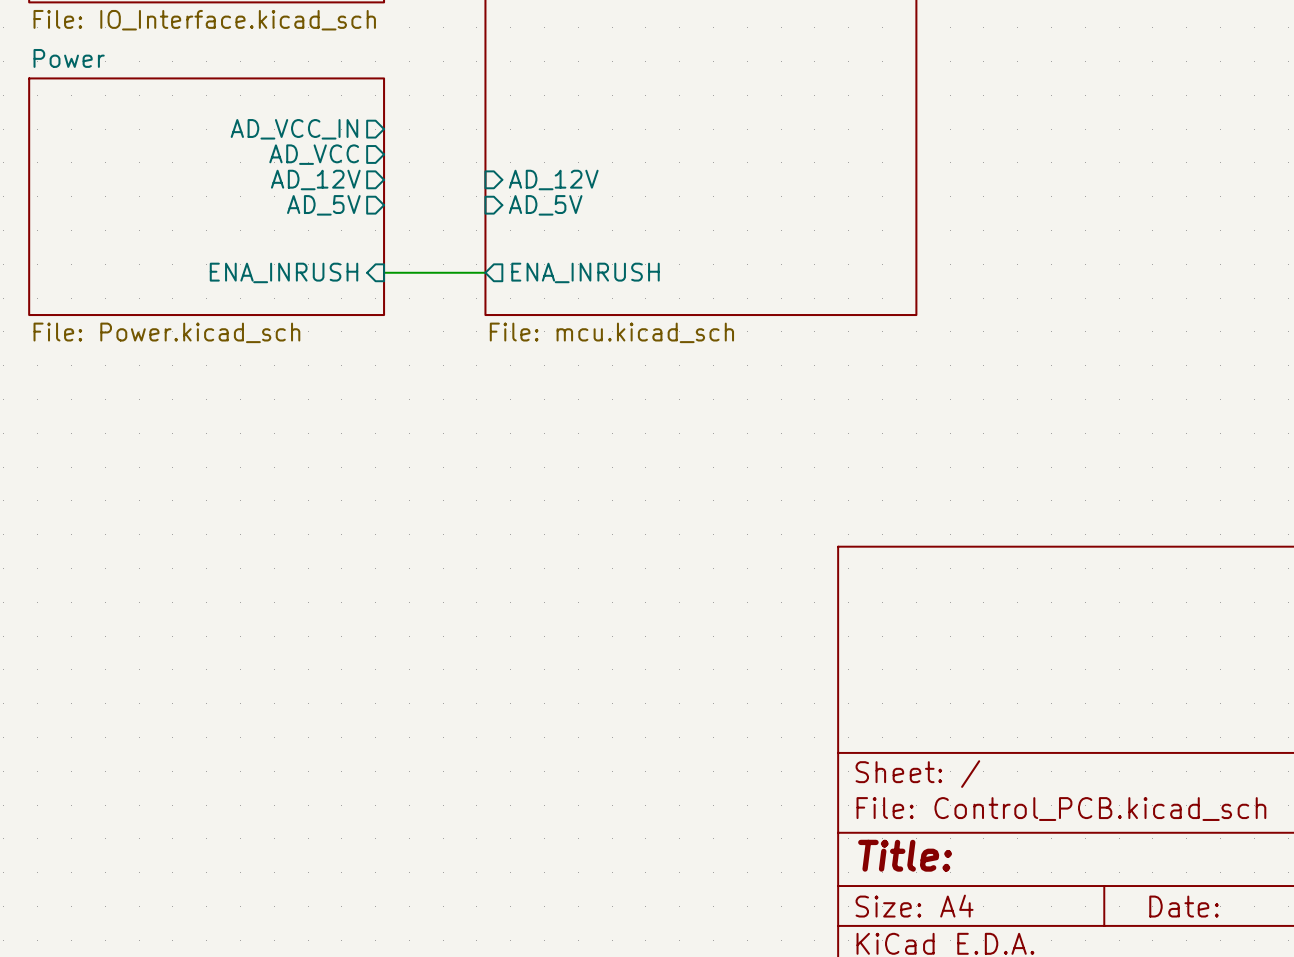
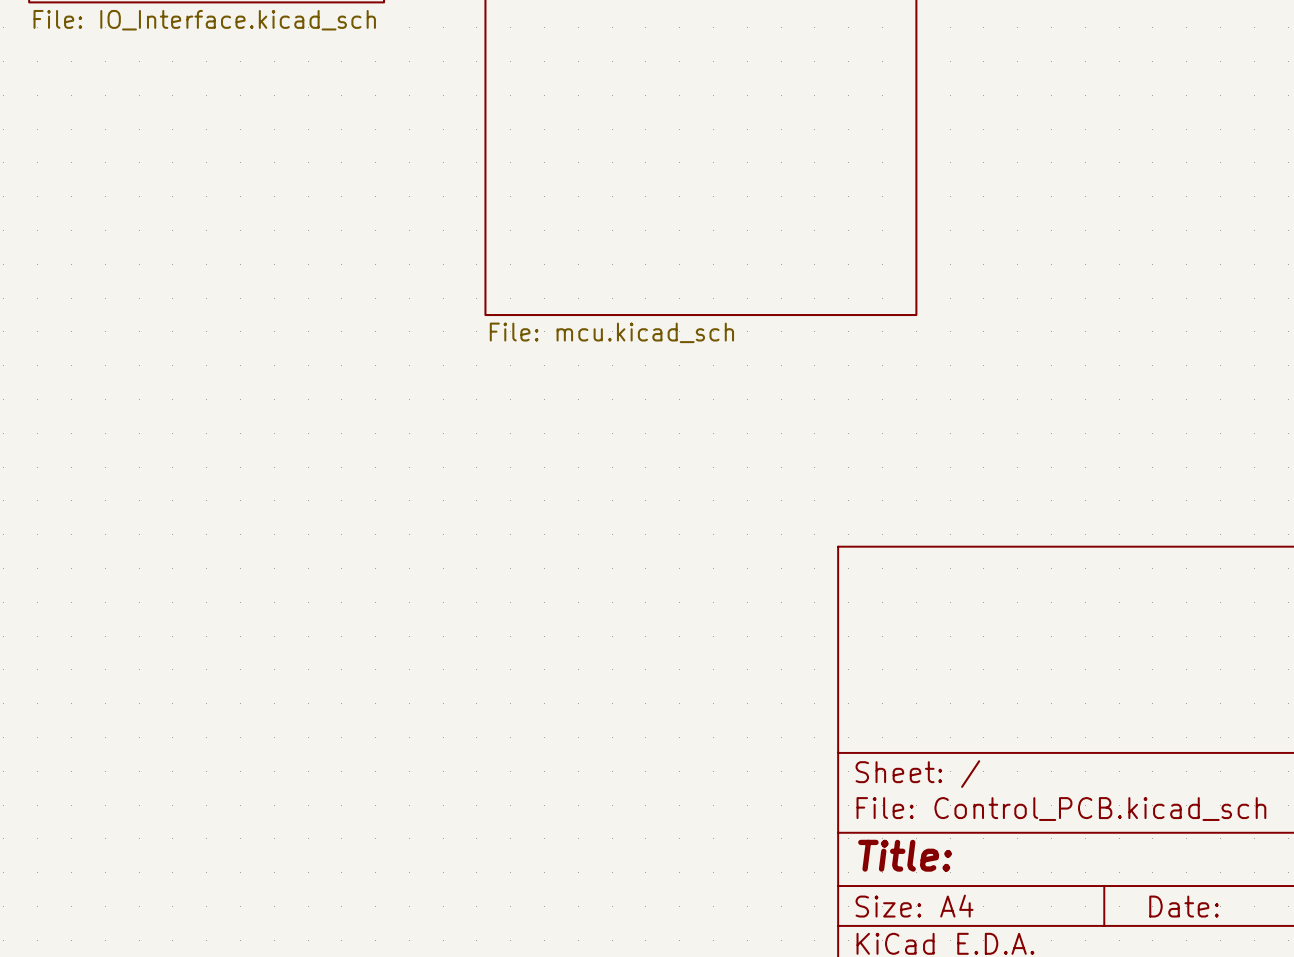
sheet pin: AD_VCC_IN (294, 129) -> none
sheet pin: AD_VCC (314, 154) -> none
sheet pin: AD_12V (315, 180) -> none
sheet pin: AD_12V (553, 180) -> none
sheet Power: File: Power.kicad_sch (206, 196) -> none
sheet pin: AD_5V (323, 205) -> none
sheet pin: AD_5V (545, 205) -> none
sheet pin: ENA_INRUSH (284, 272) -> none
wire: (384, 272) (485, 272) -> none
sheet pin: ENA_INRUSH (585, 272) -> none

